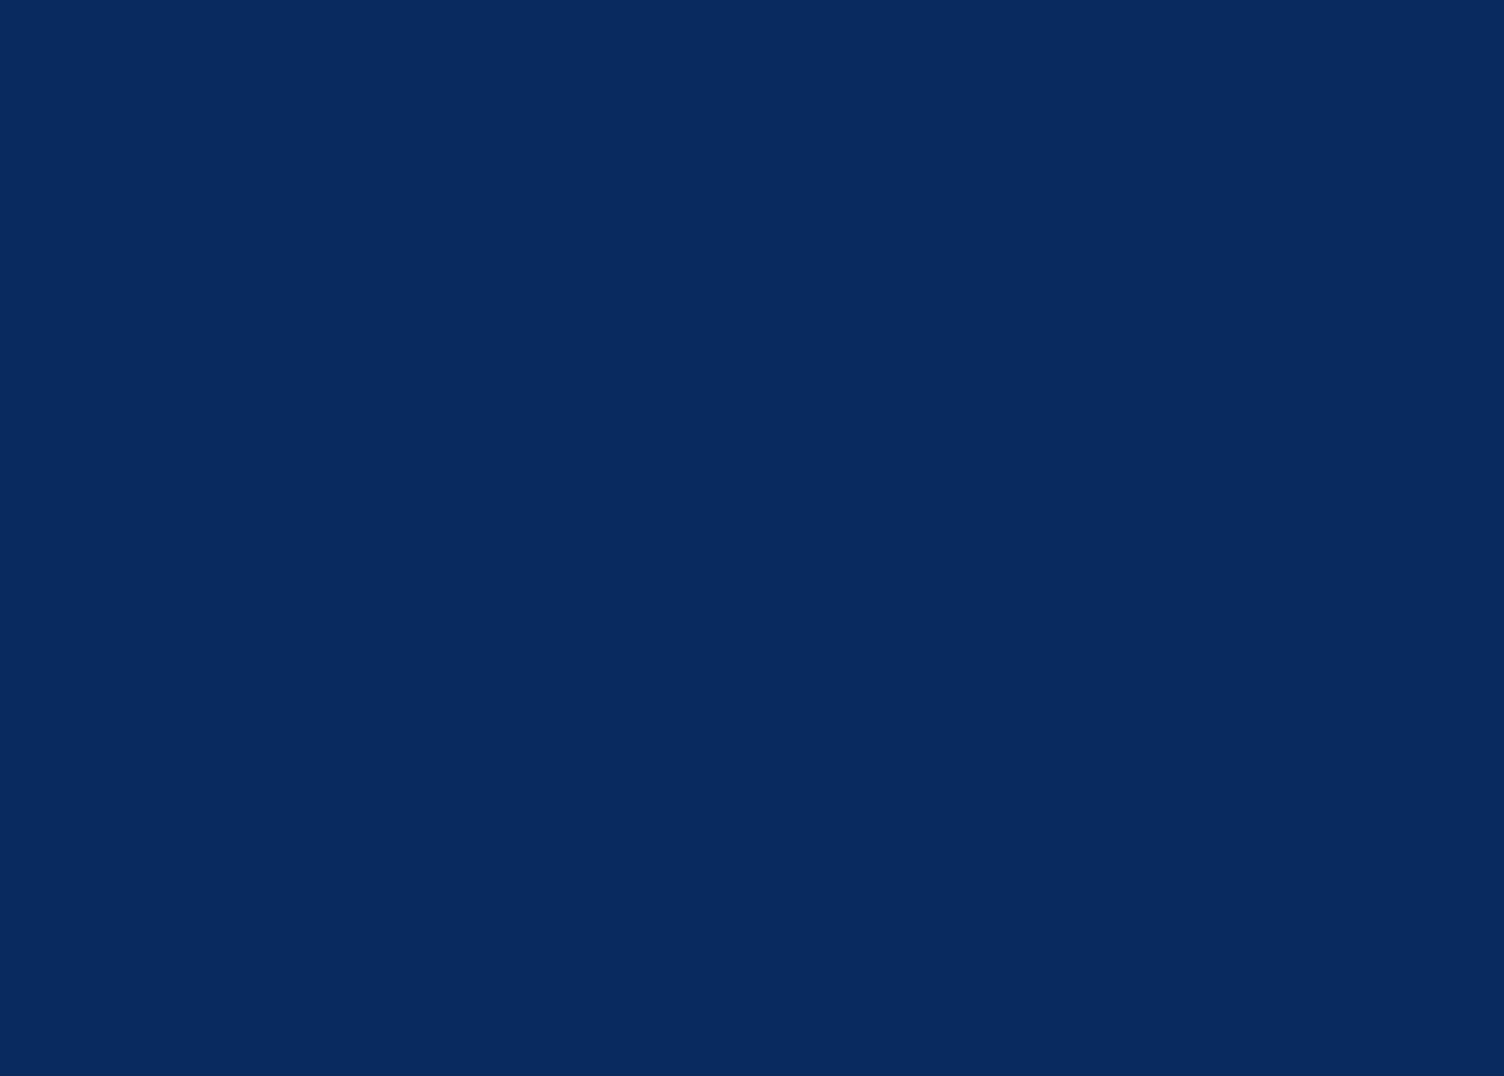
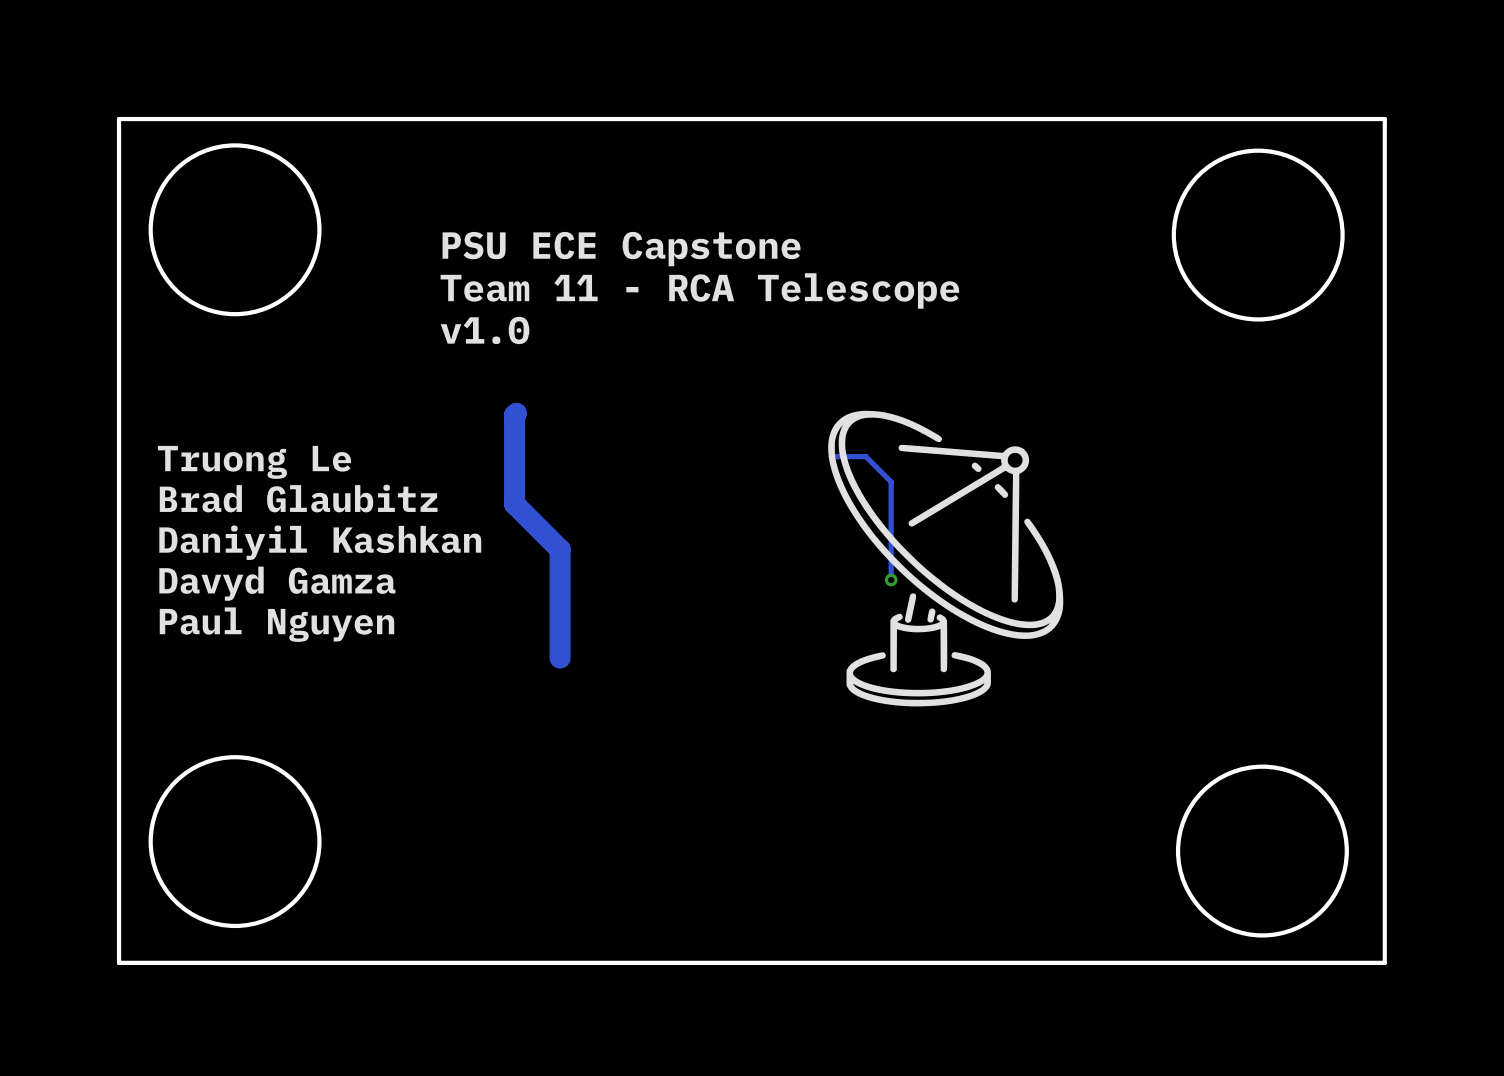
board edge: none -> (1384, 119) (119, 119) (119, 962) (1384, 962) (1384, 119)
round board edge: none -> [148, 143, 322, 317]
round board edge: none -> [1171, 148, 1345, 322]
text: none -> PSU ECE Capstone (621, 249)
text: none -> Team 11 - RCA Telescope (699, 290)
text: none -> v1.0 (485, 330)
drawing: none -> [828, 410, 1064, 707]
track: none -> (516, 413) (514, 415) (514, 504) (560, 549) (560, 658)
track: none -> (831, 456) (865, 456) (891, 481) (891, 580)
text: none -> Truong Le (254, 462)
text: none -> Brad Glaubitz (298, 498)
text: none -> Daniyil Kashkan (320, 542)
via: none -> (891, 580)
text: none -> Davyd Gamza (277, 583)
text: none -> Paul Nguyen (276, 624)
round board edge: none -> [148, 755, 322, 929]
round board edge: none -> [1175, 764, 1349, 938]

